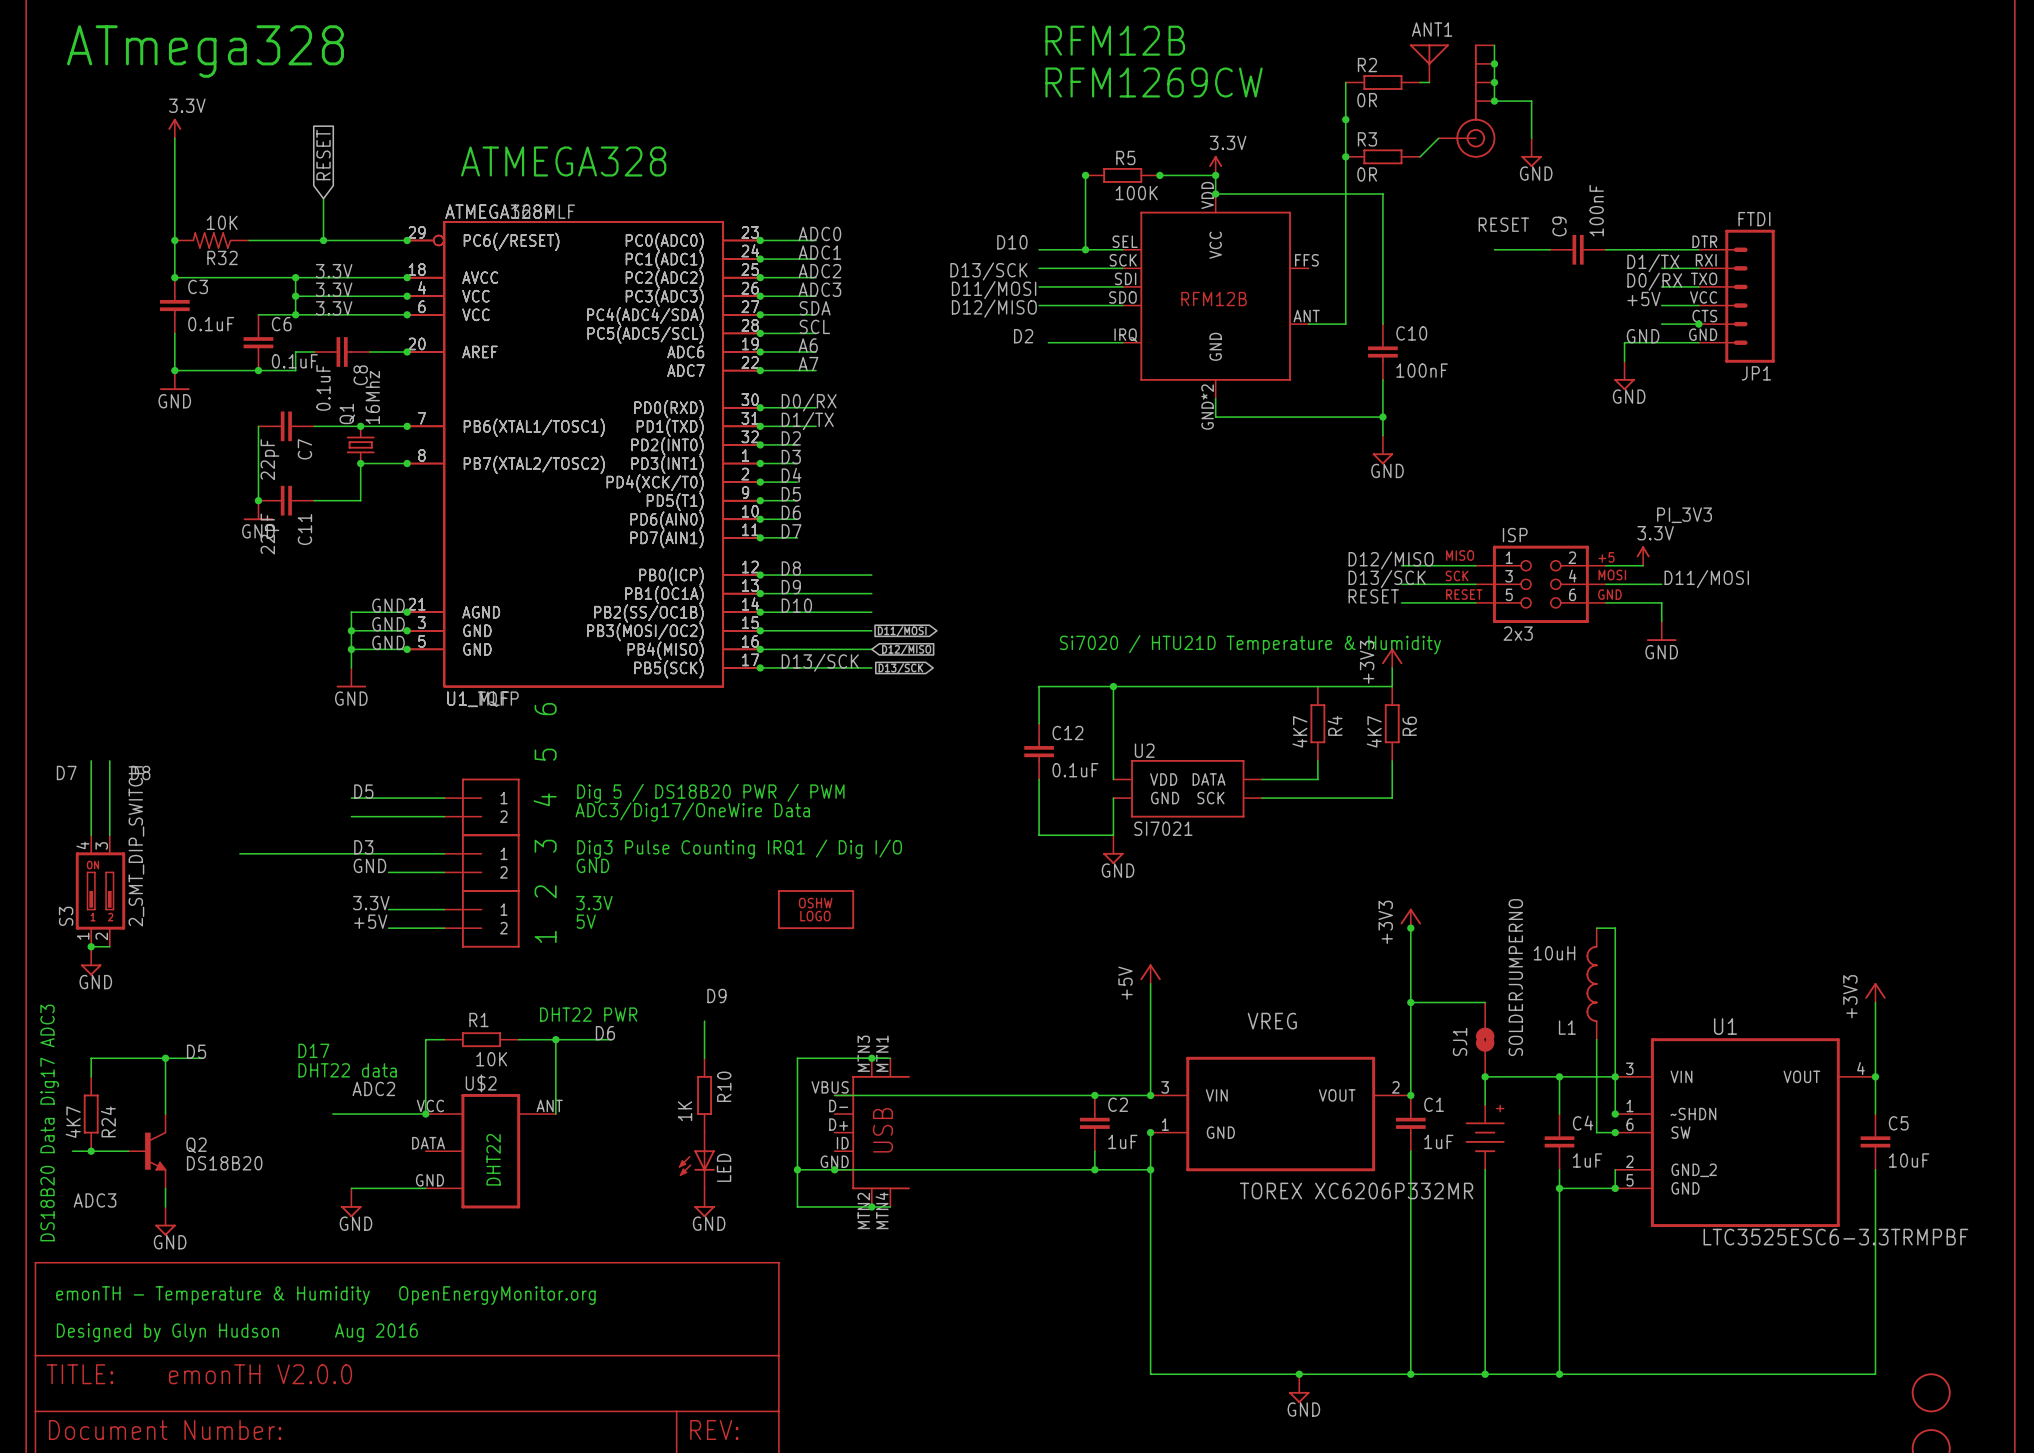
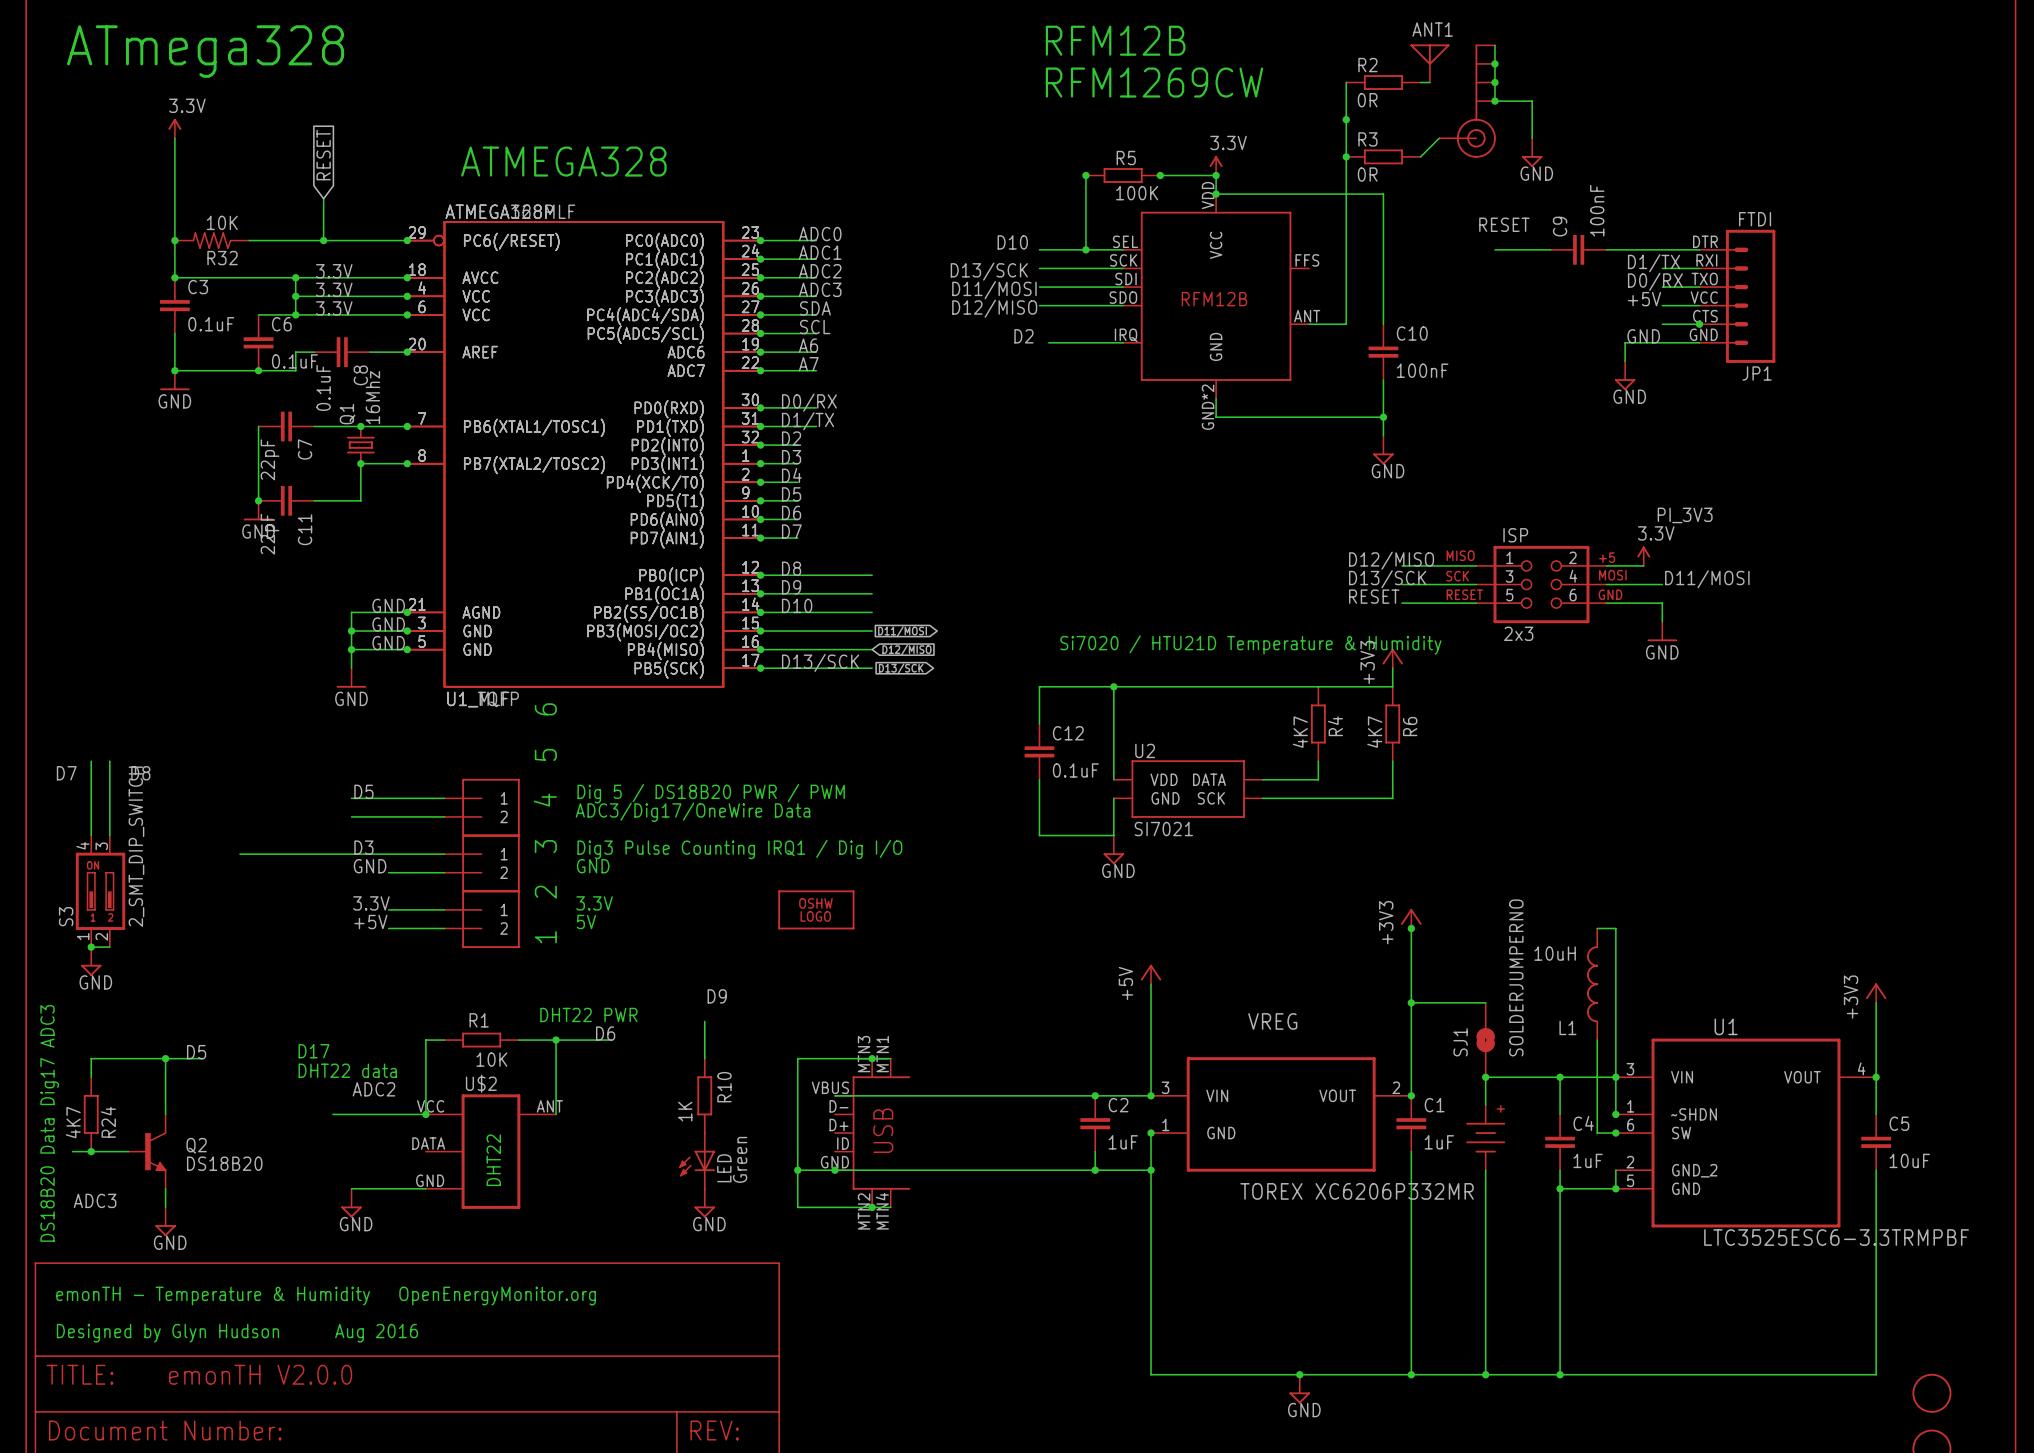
LED value: none -> Green (740, 1159)

